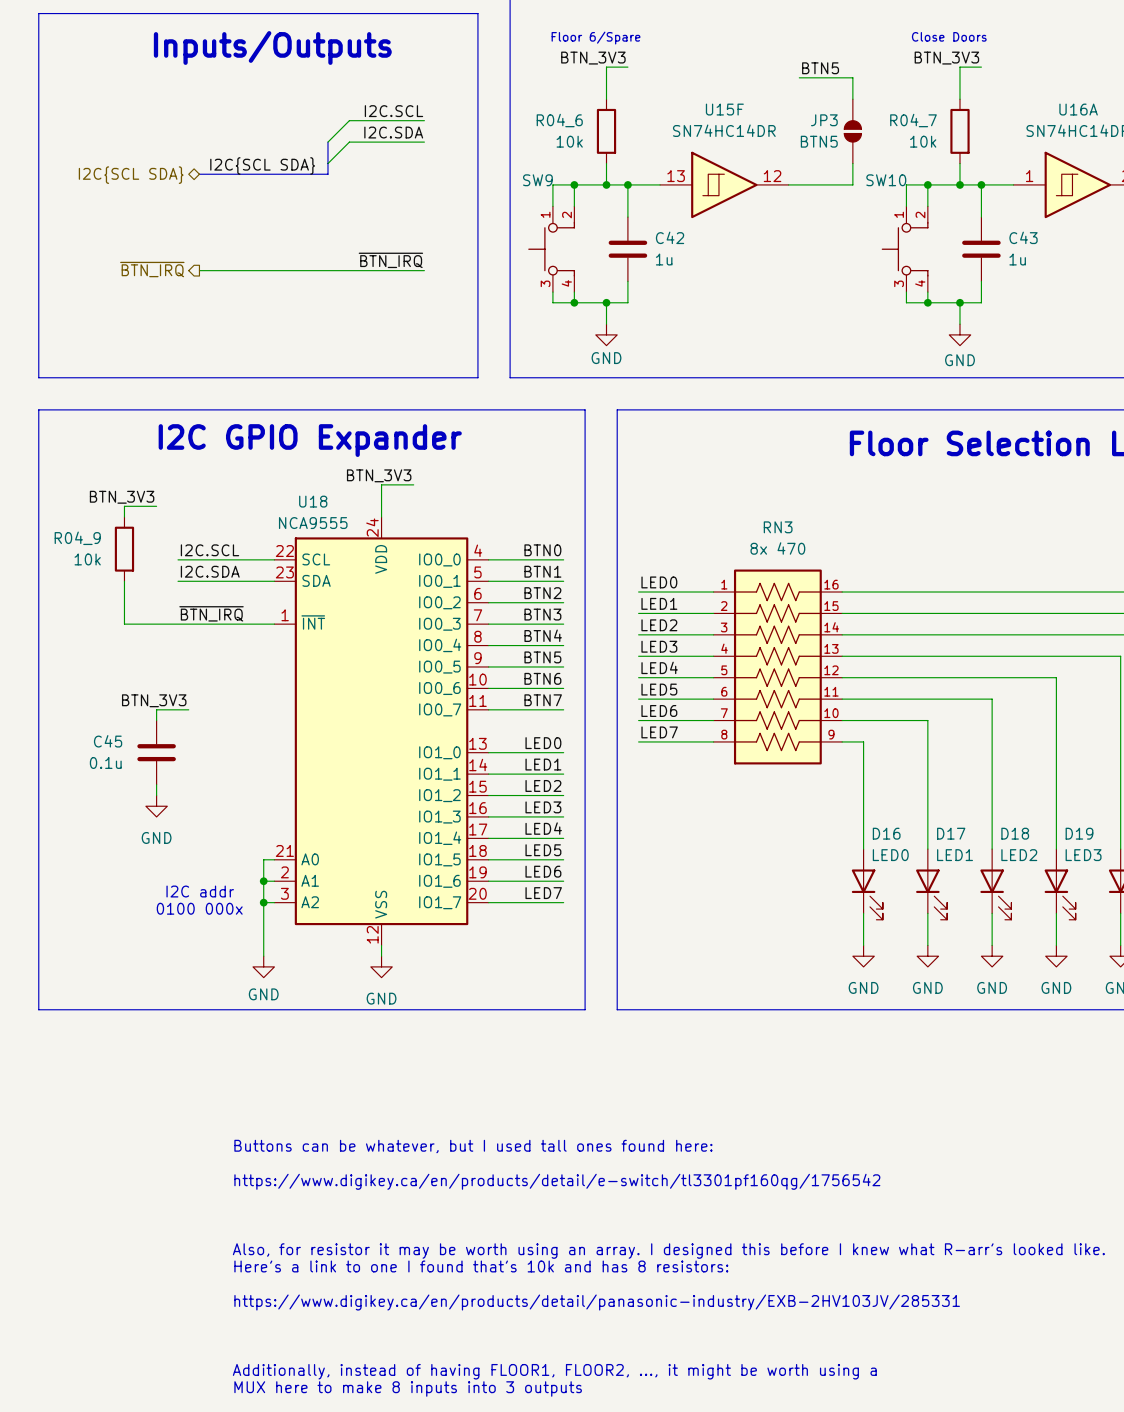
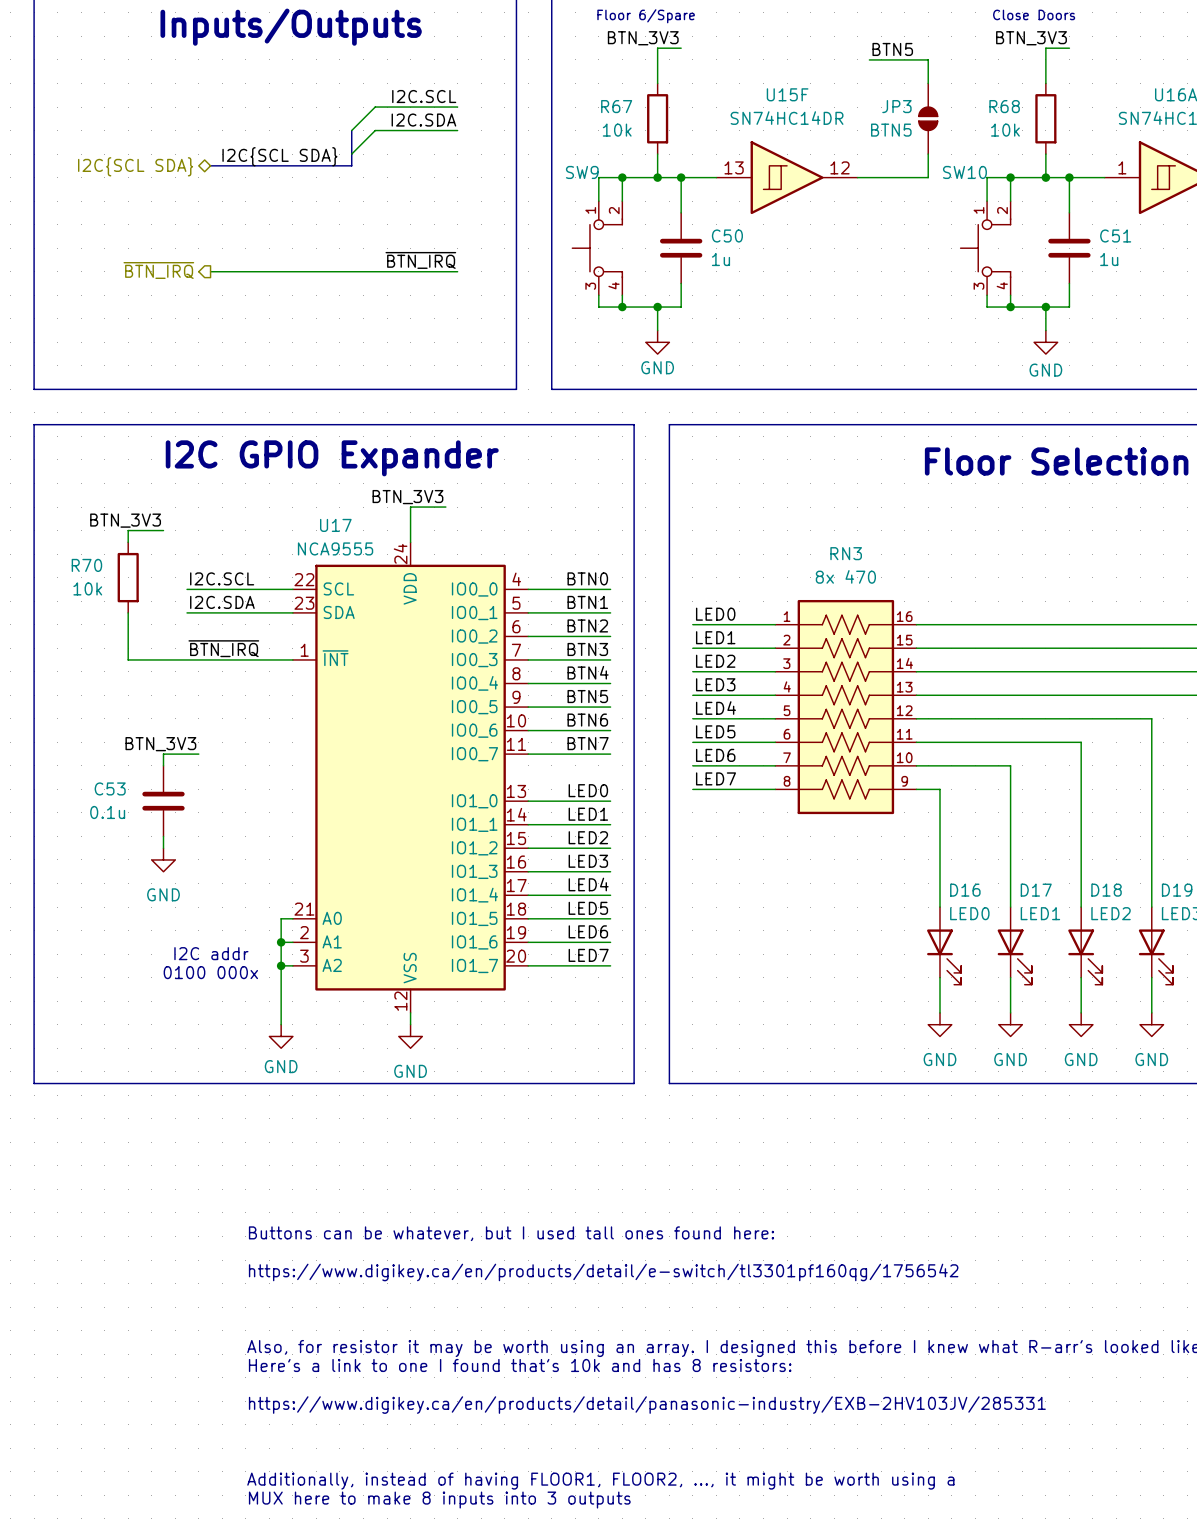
R04_6 name: R04_6 (559, 120) -> R67 (616, 106)
R04_7 name: R04_7 (913, 120) -> R68 (1004, 106)
C42 name: C42 (670, 237) -> C50 (727, 235)
C43 name: C43 (1023, 237) -> C51 (1115, 235)
U18 name: U18 (313, 501) -> U17 (335, 525)
R04_9 name: R04_9 (77, 538) -> R70 (86, 565)
C45 name: C45 (108, 741) -> C53 (110, 788)

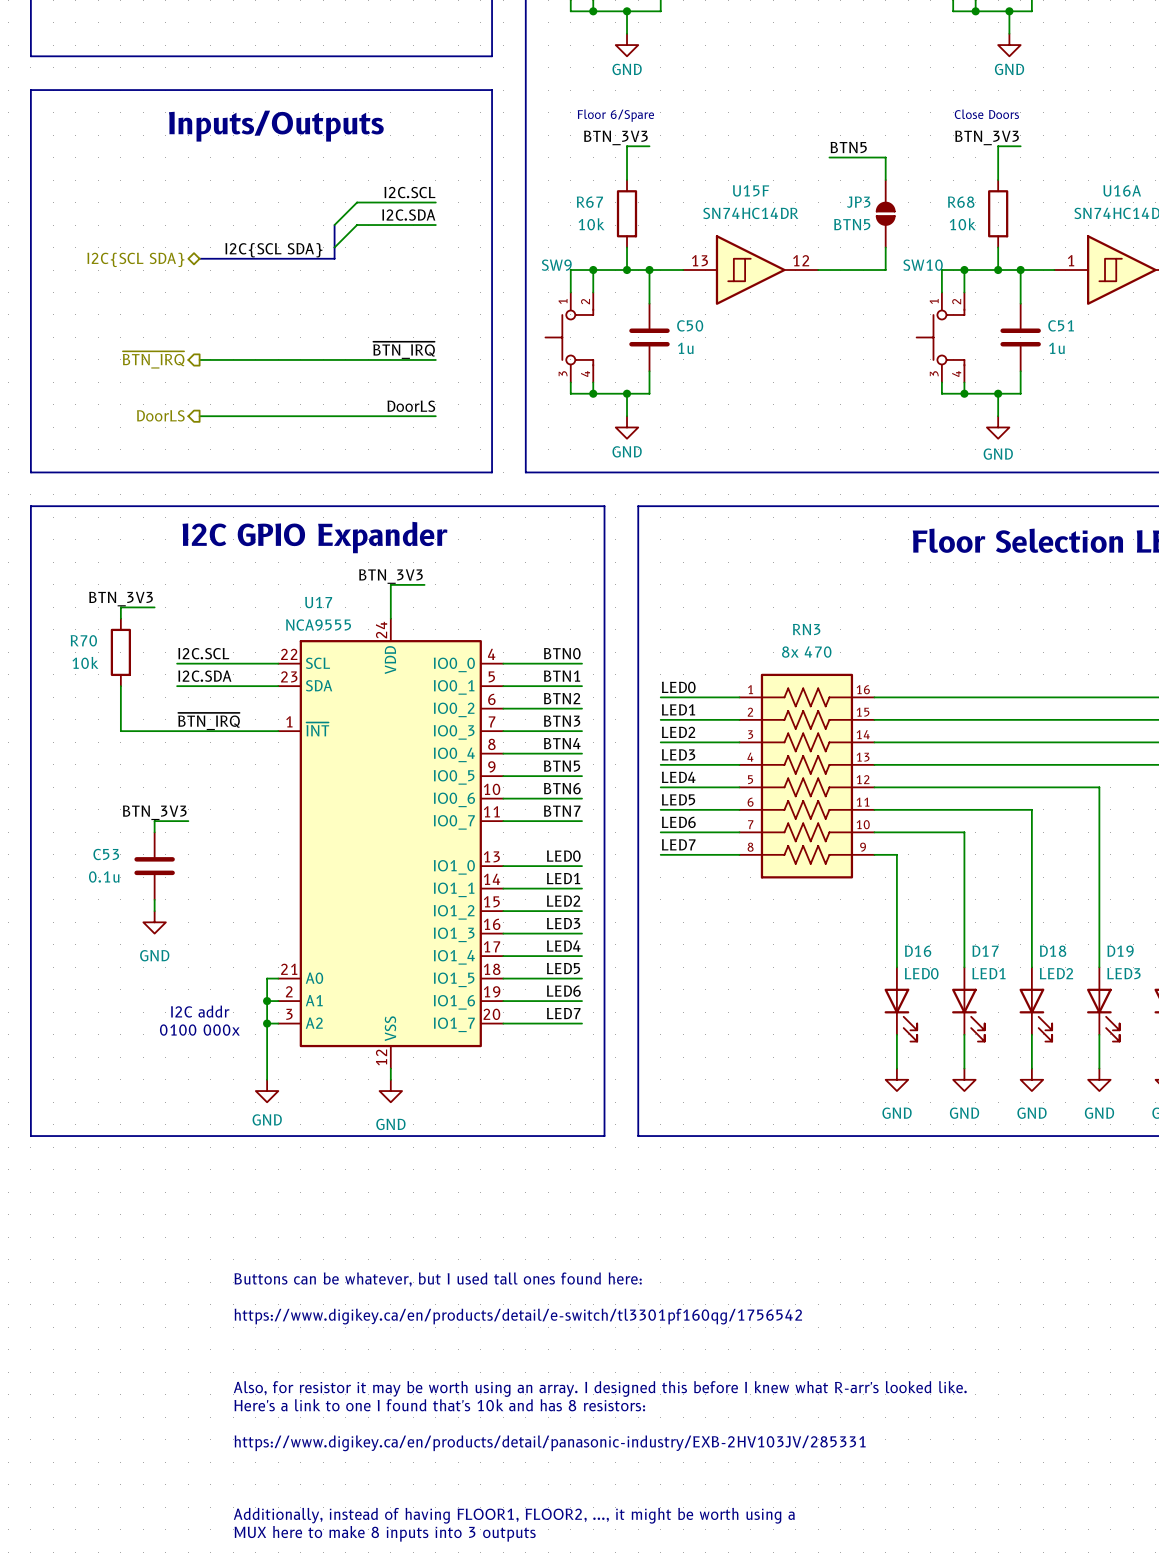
label: none -> DoorLS (411, 406)
hierarchical label: none -> DoorLS (160, 415)
wire: none -> (199, 416) (435, 416)

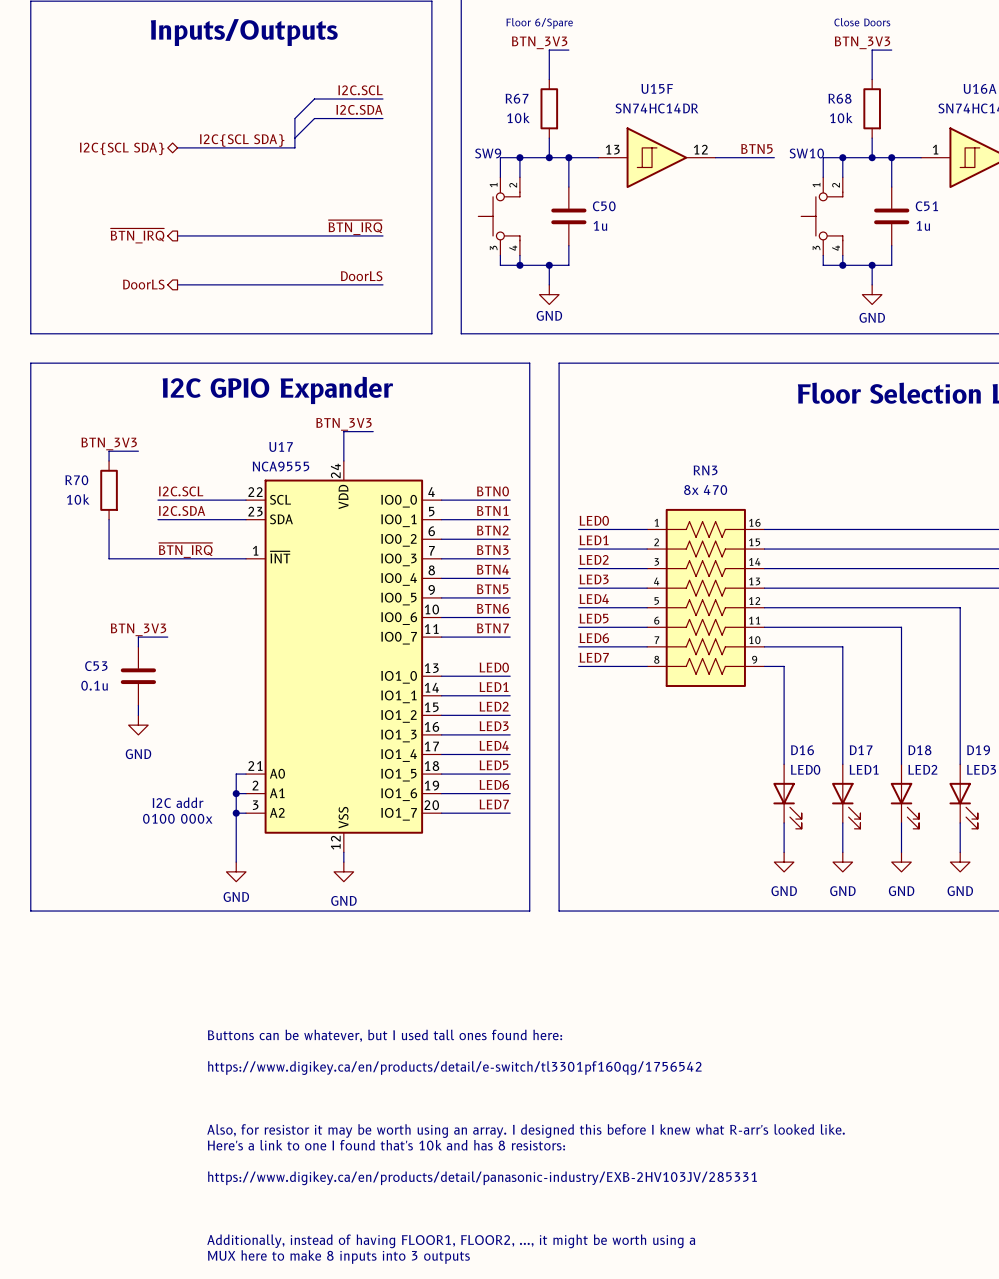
label position: BTN5 (848, 147) -> BTN5 (756, 148)
wire: (829, 157) (885, 157) (885, 180) -> none
JP3: BTN5 (885, 213) -> none
wire: (885, 247) (885, 270) -> none

